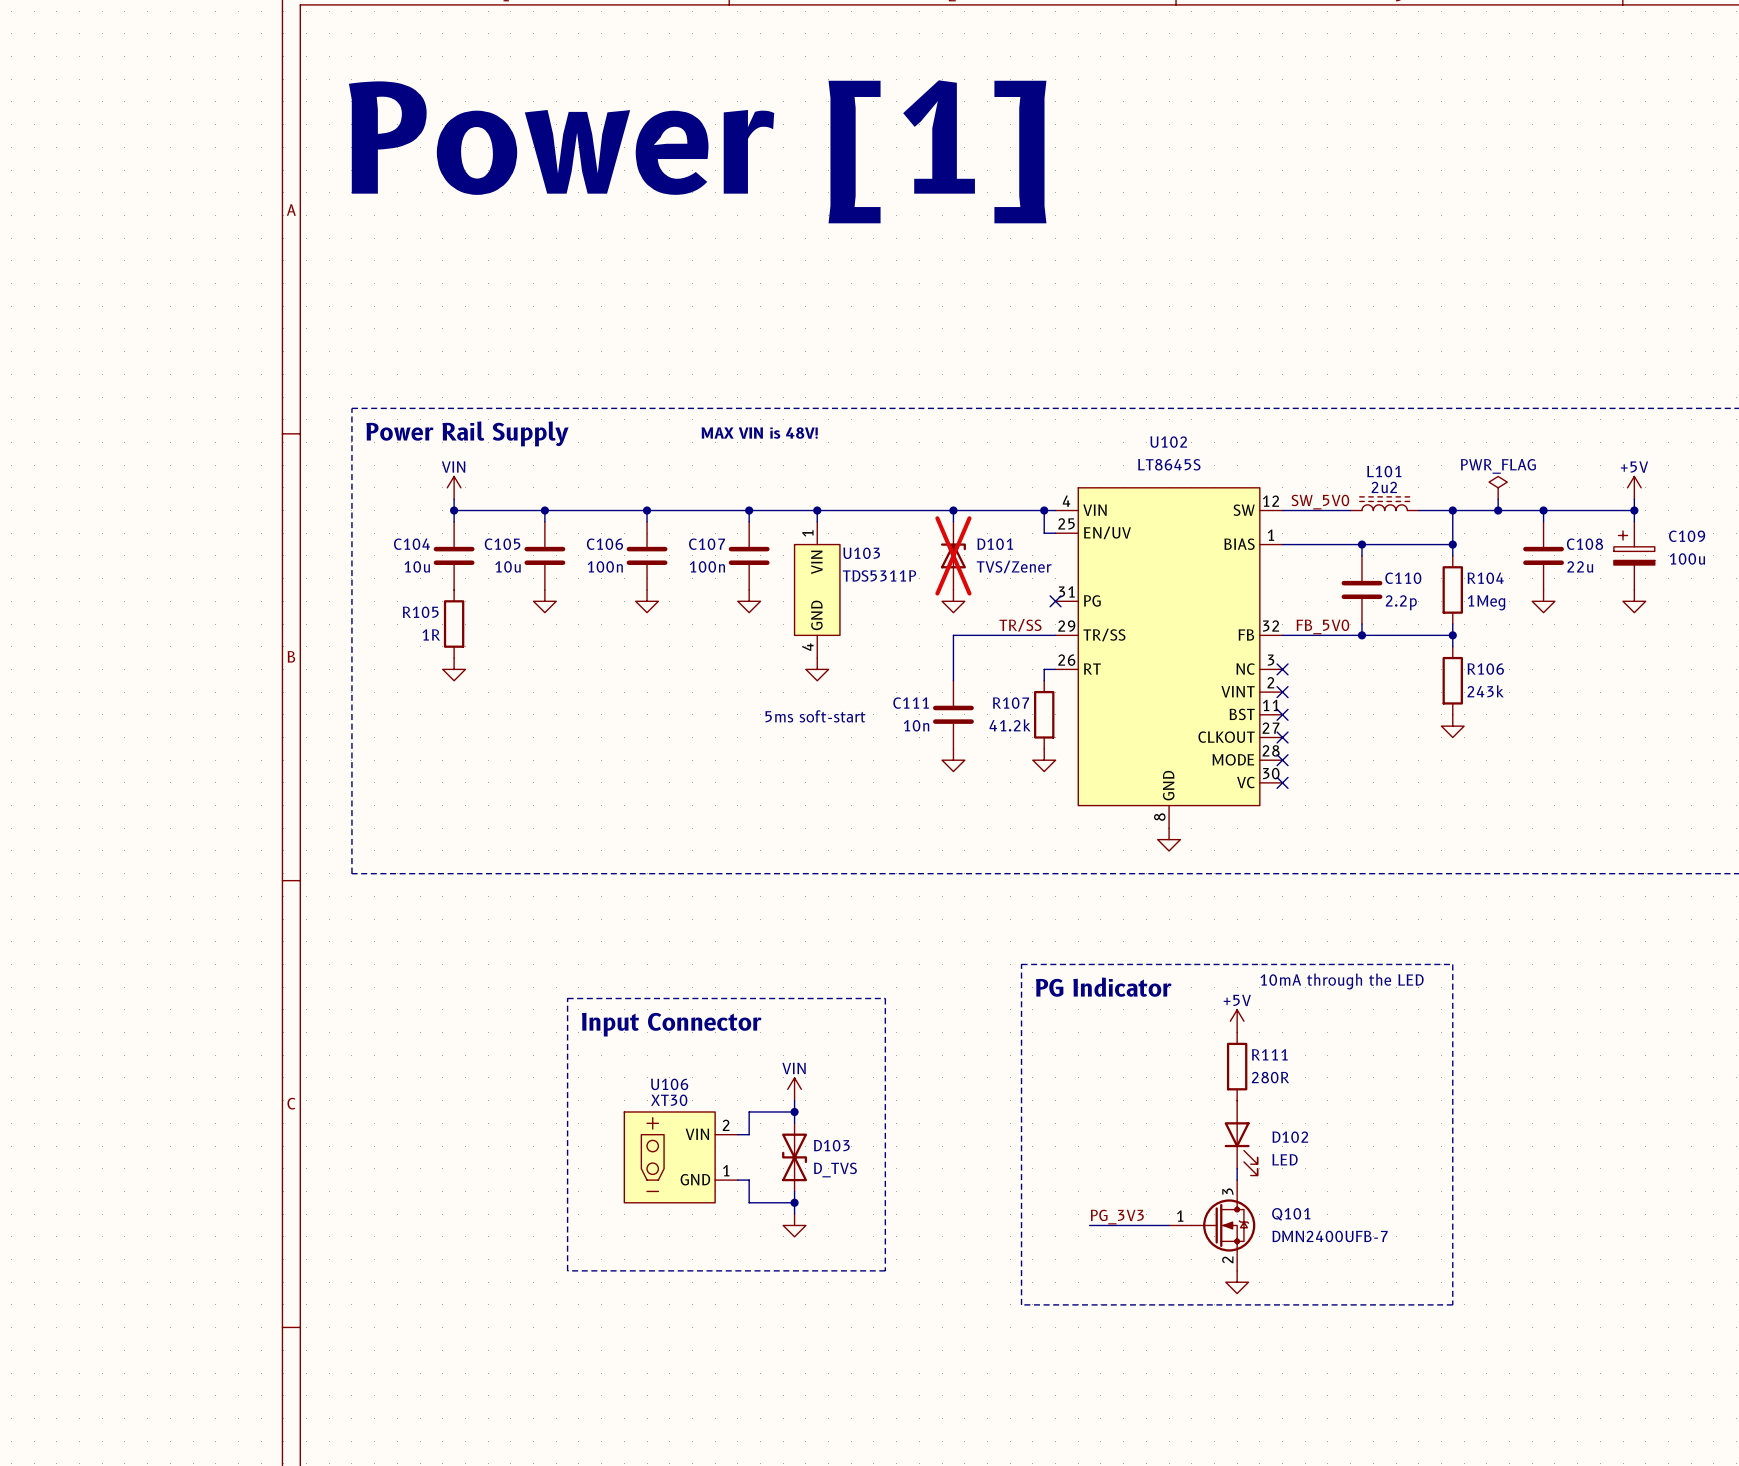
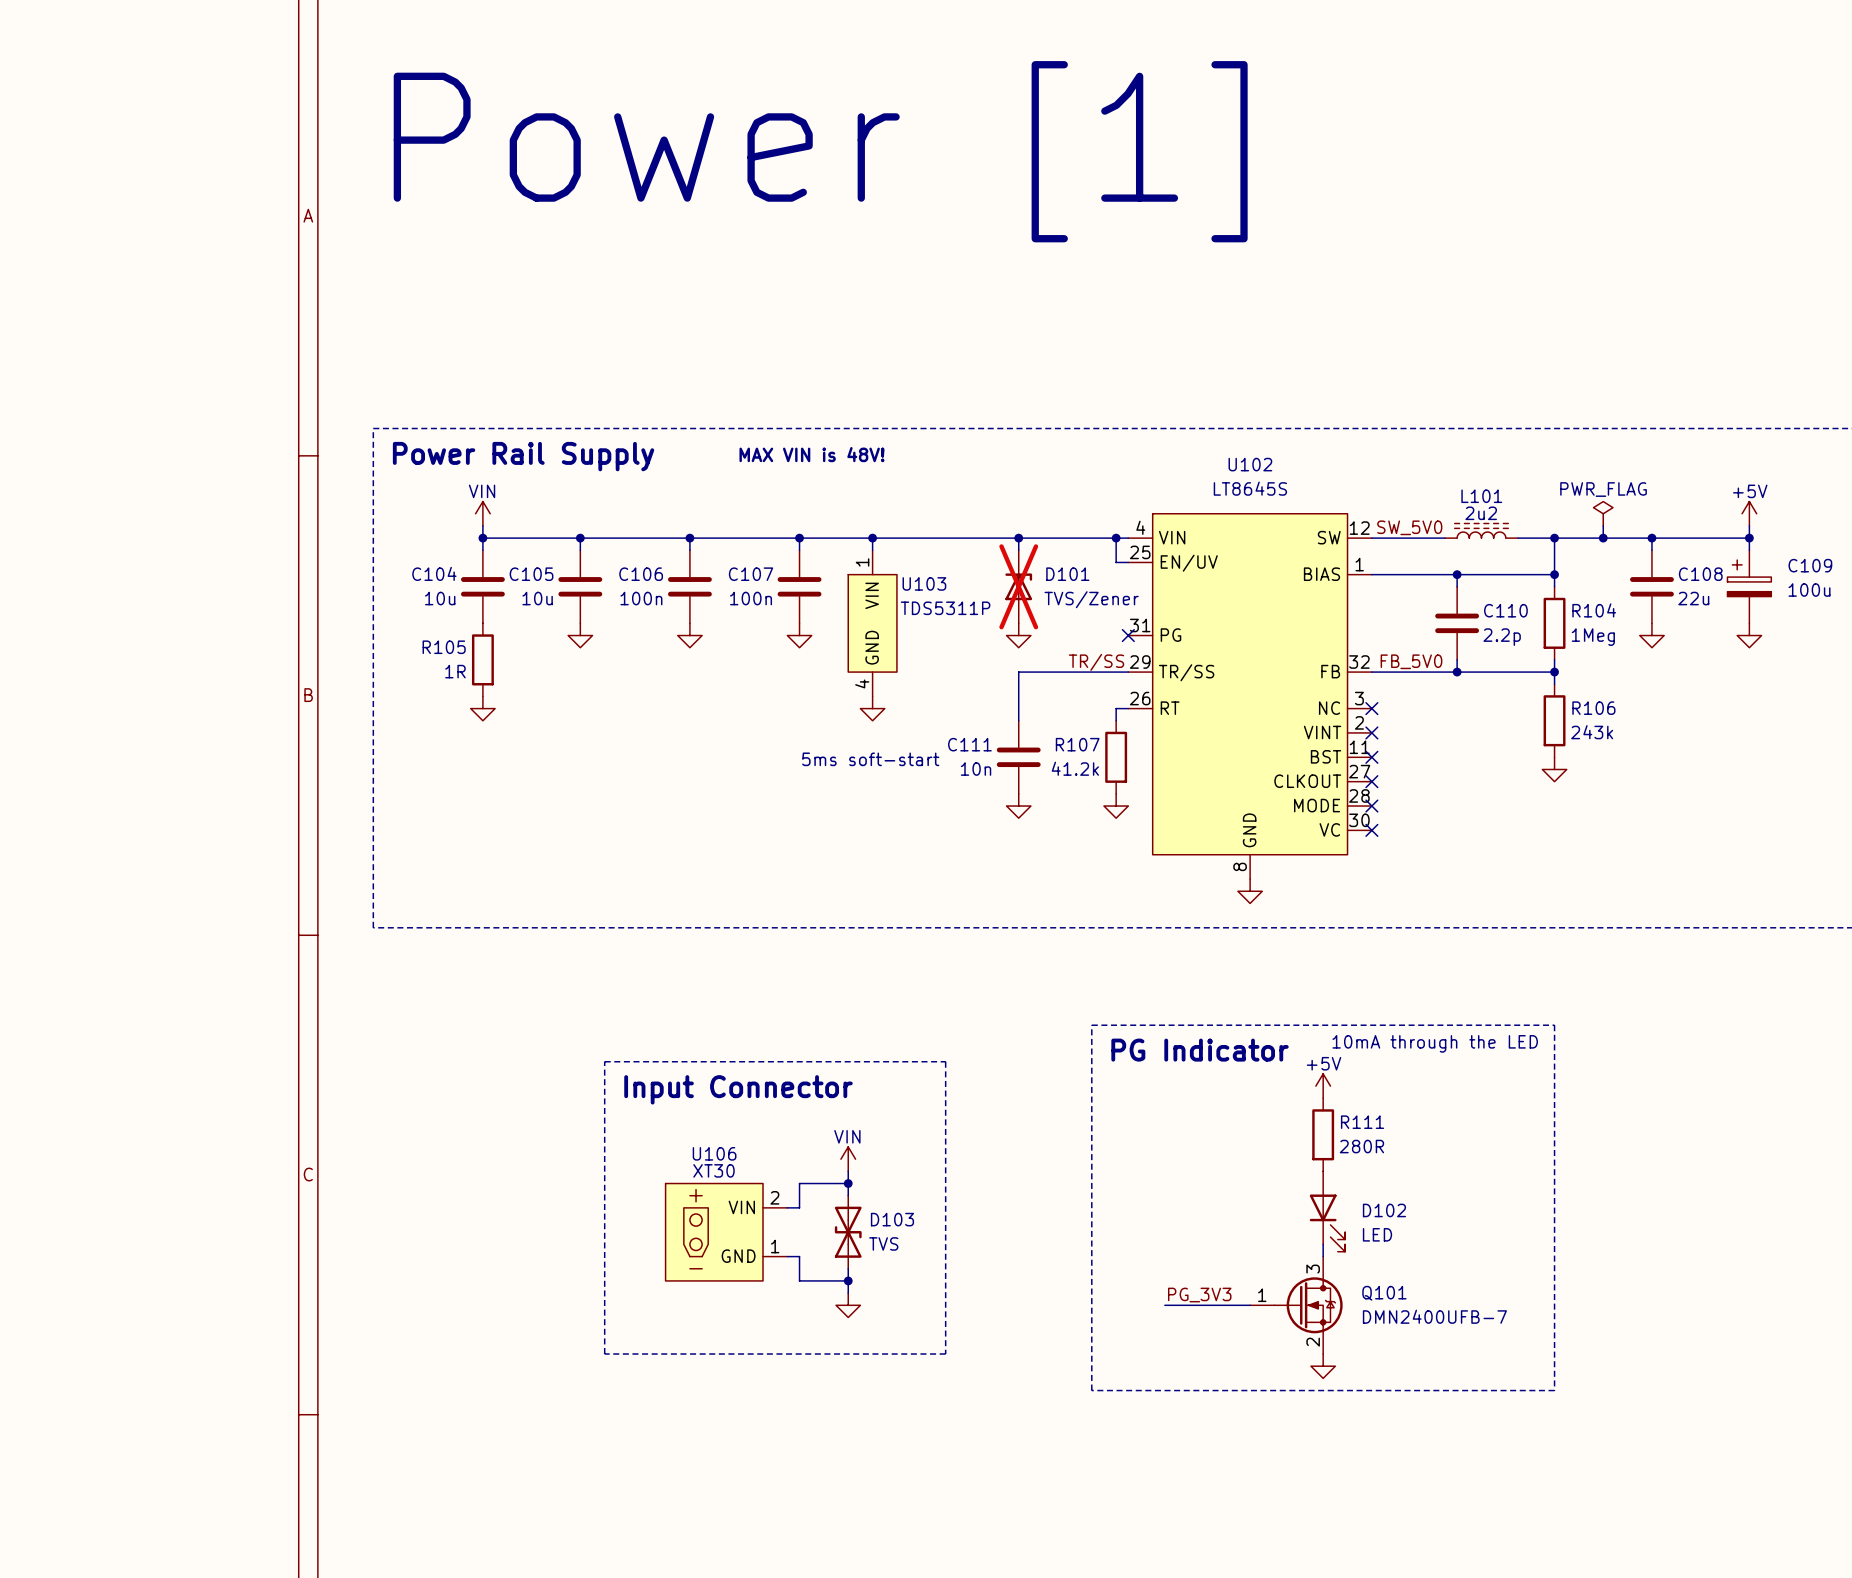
D103 value: D_TVS (835, 1170) -> TVS (883, 1243)

